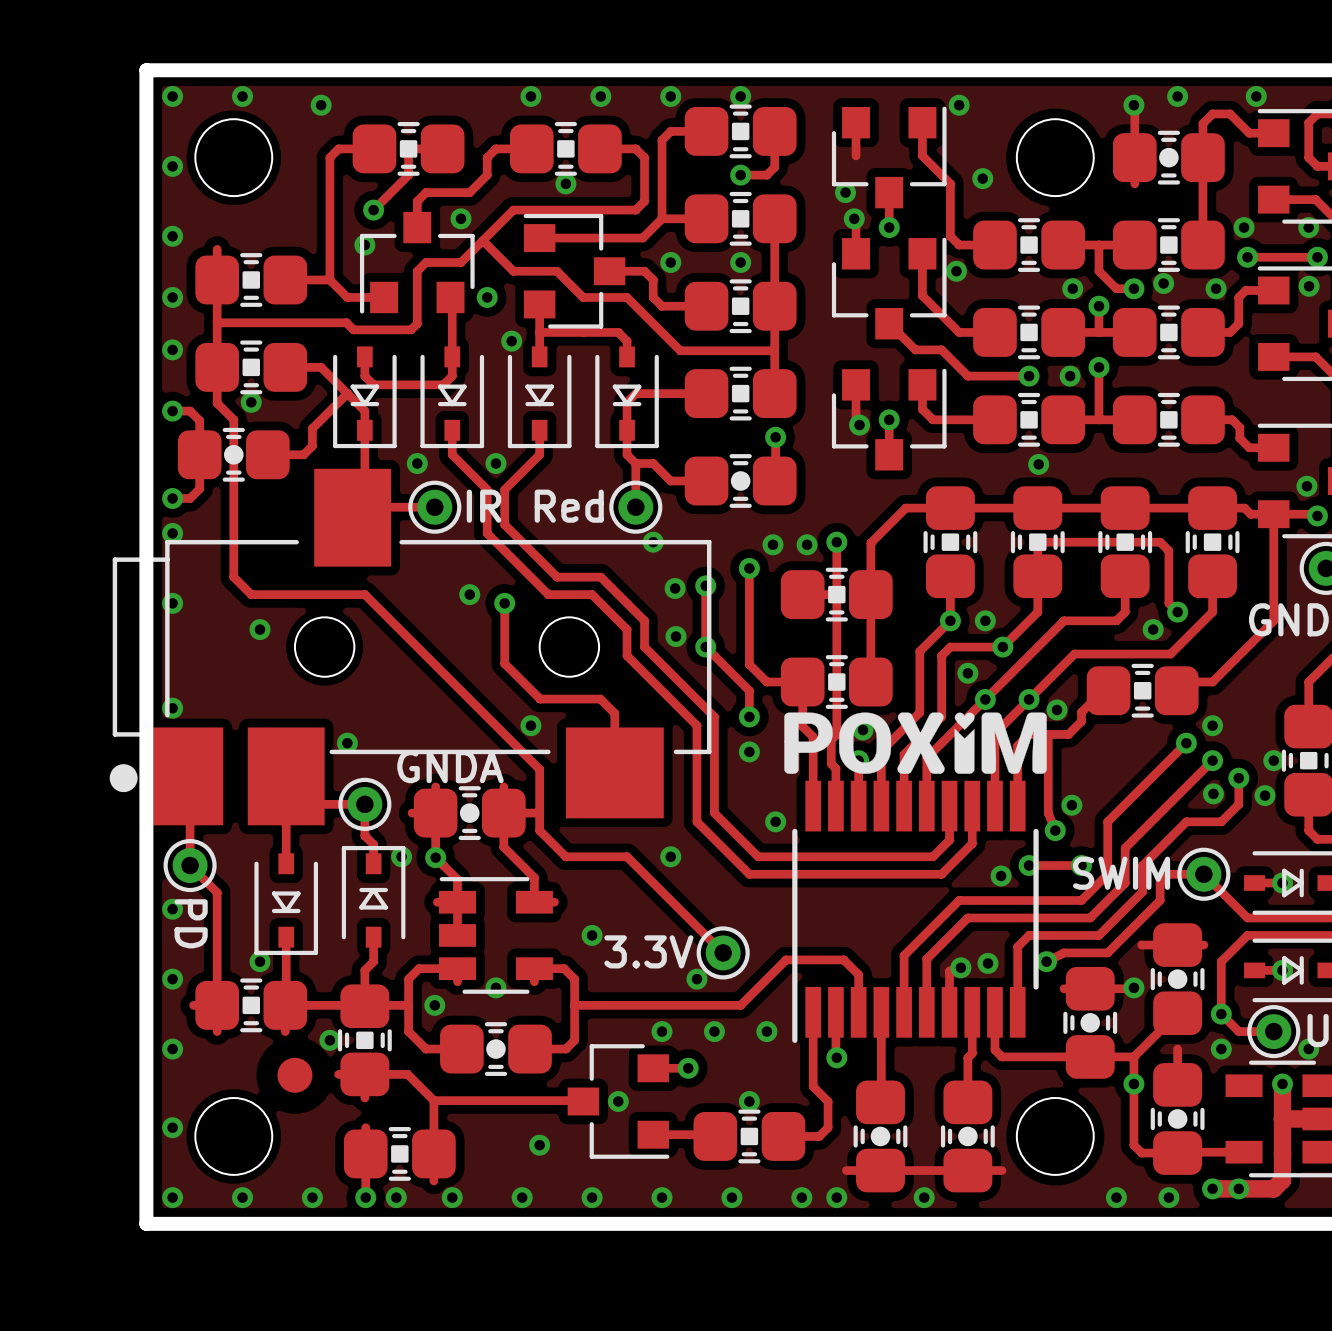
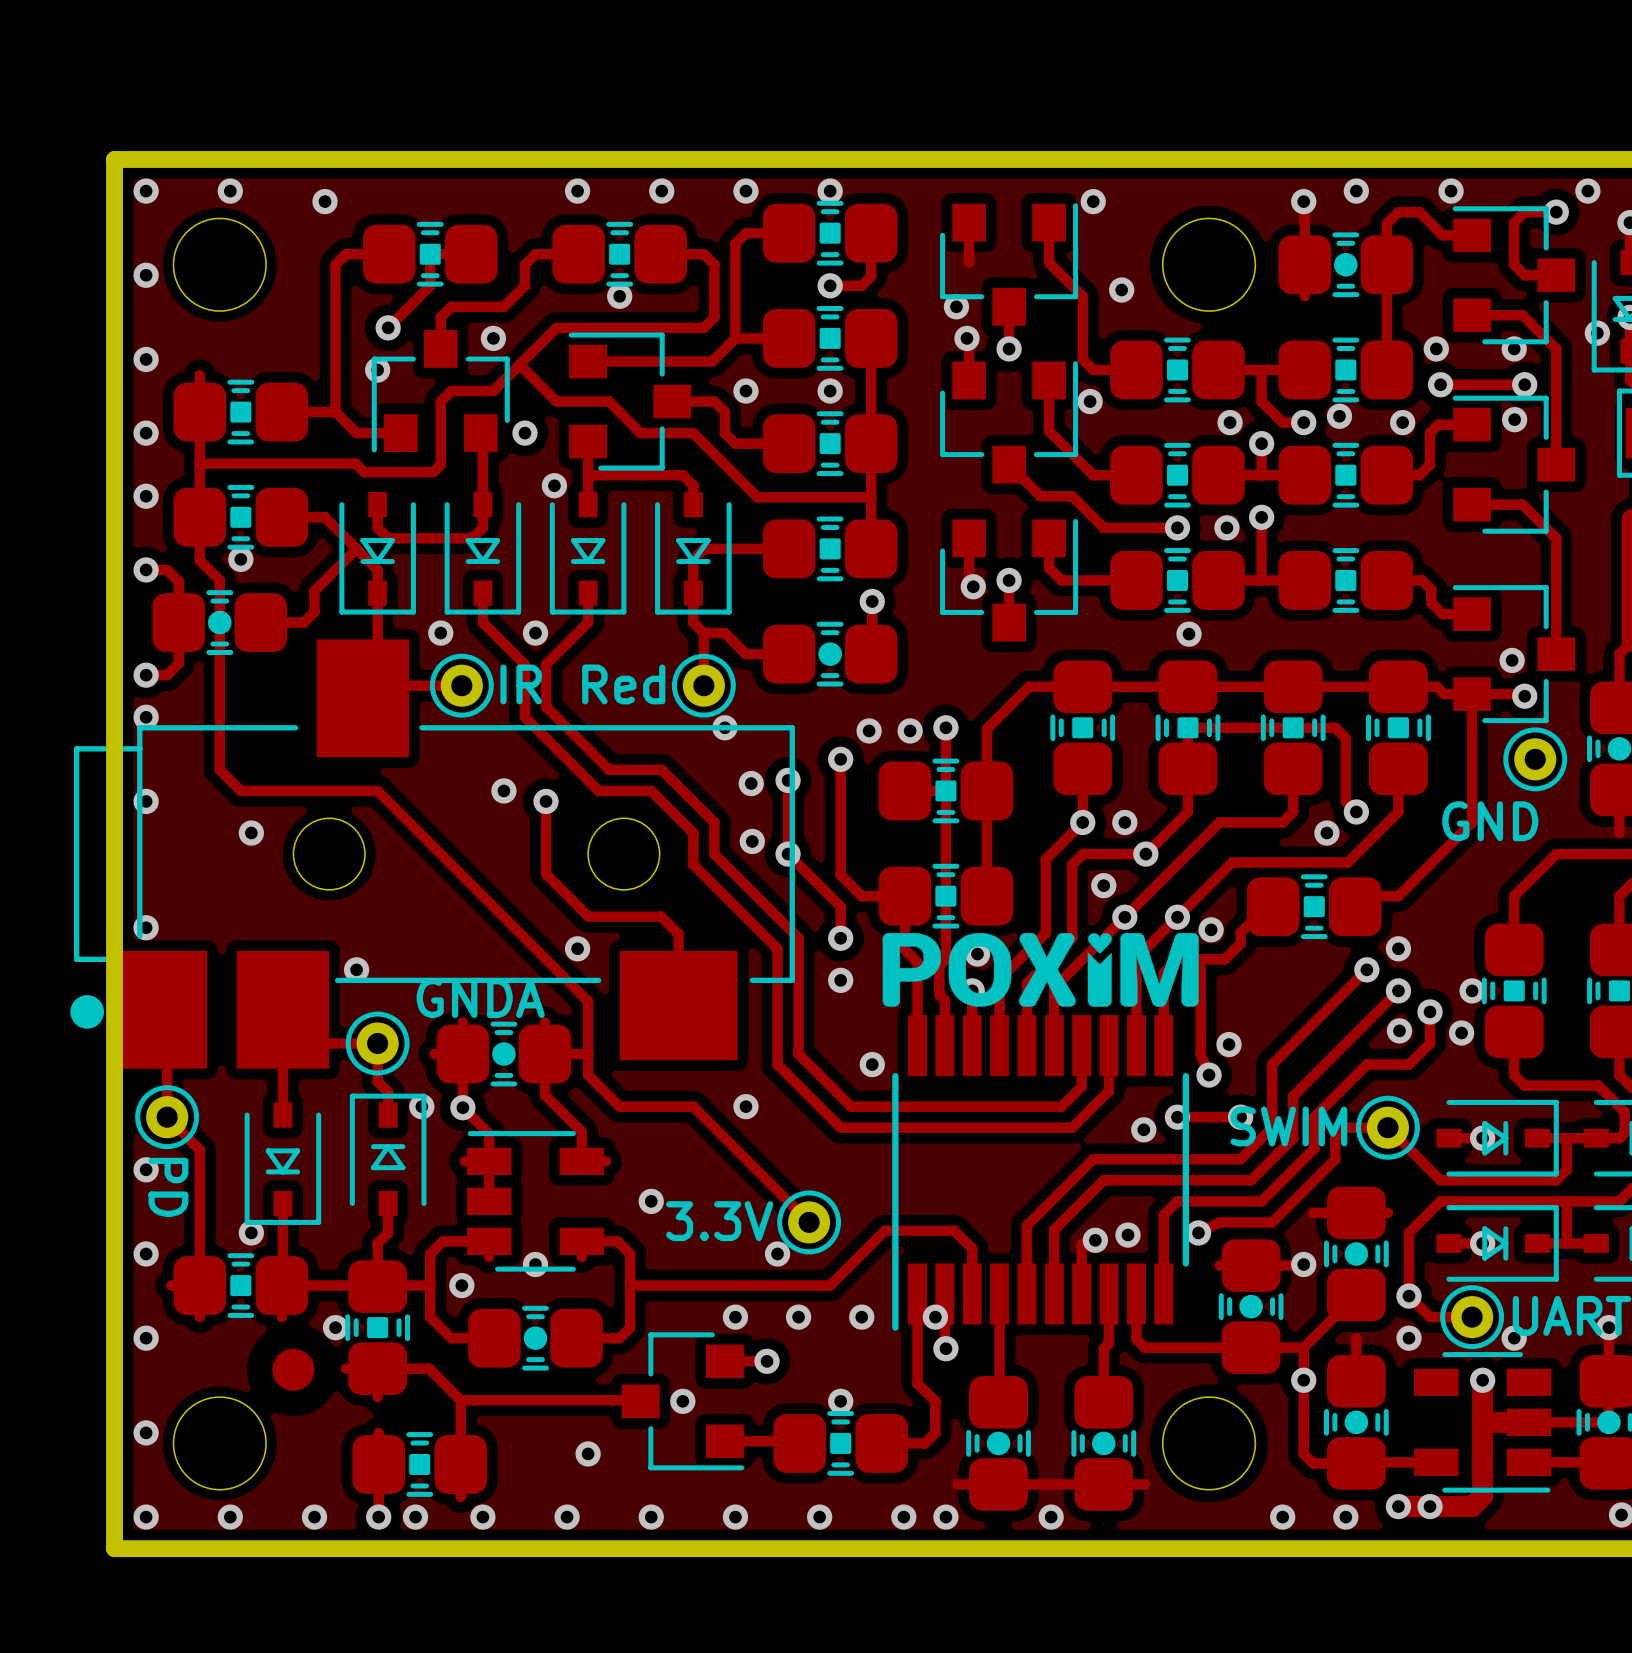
via: none -> (935, 1317)

